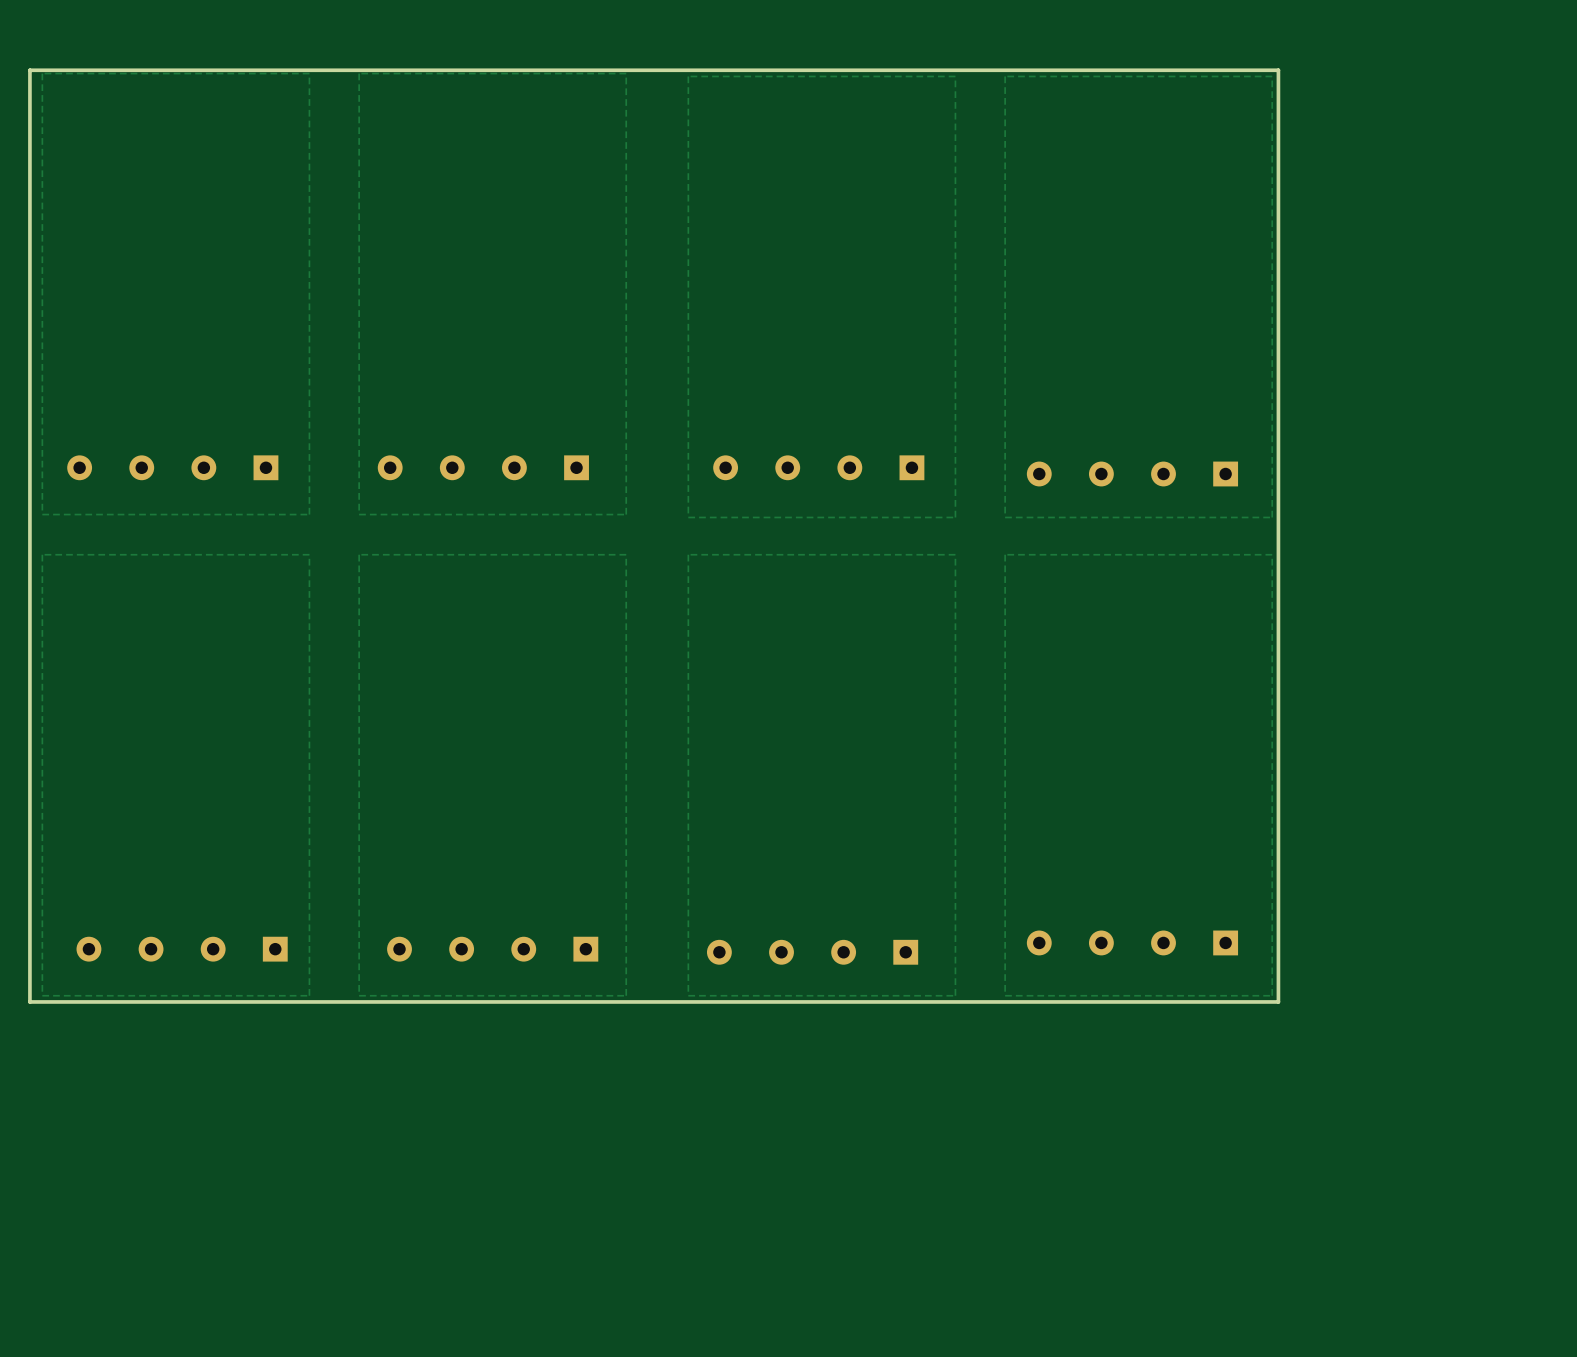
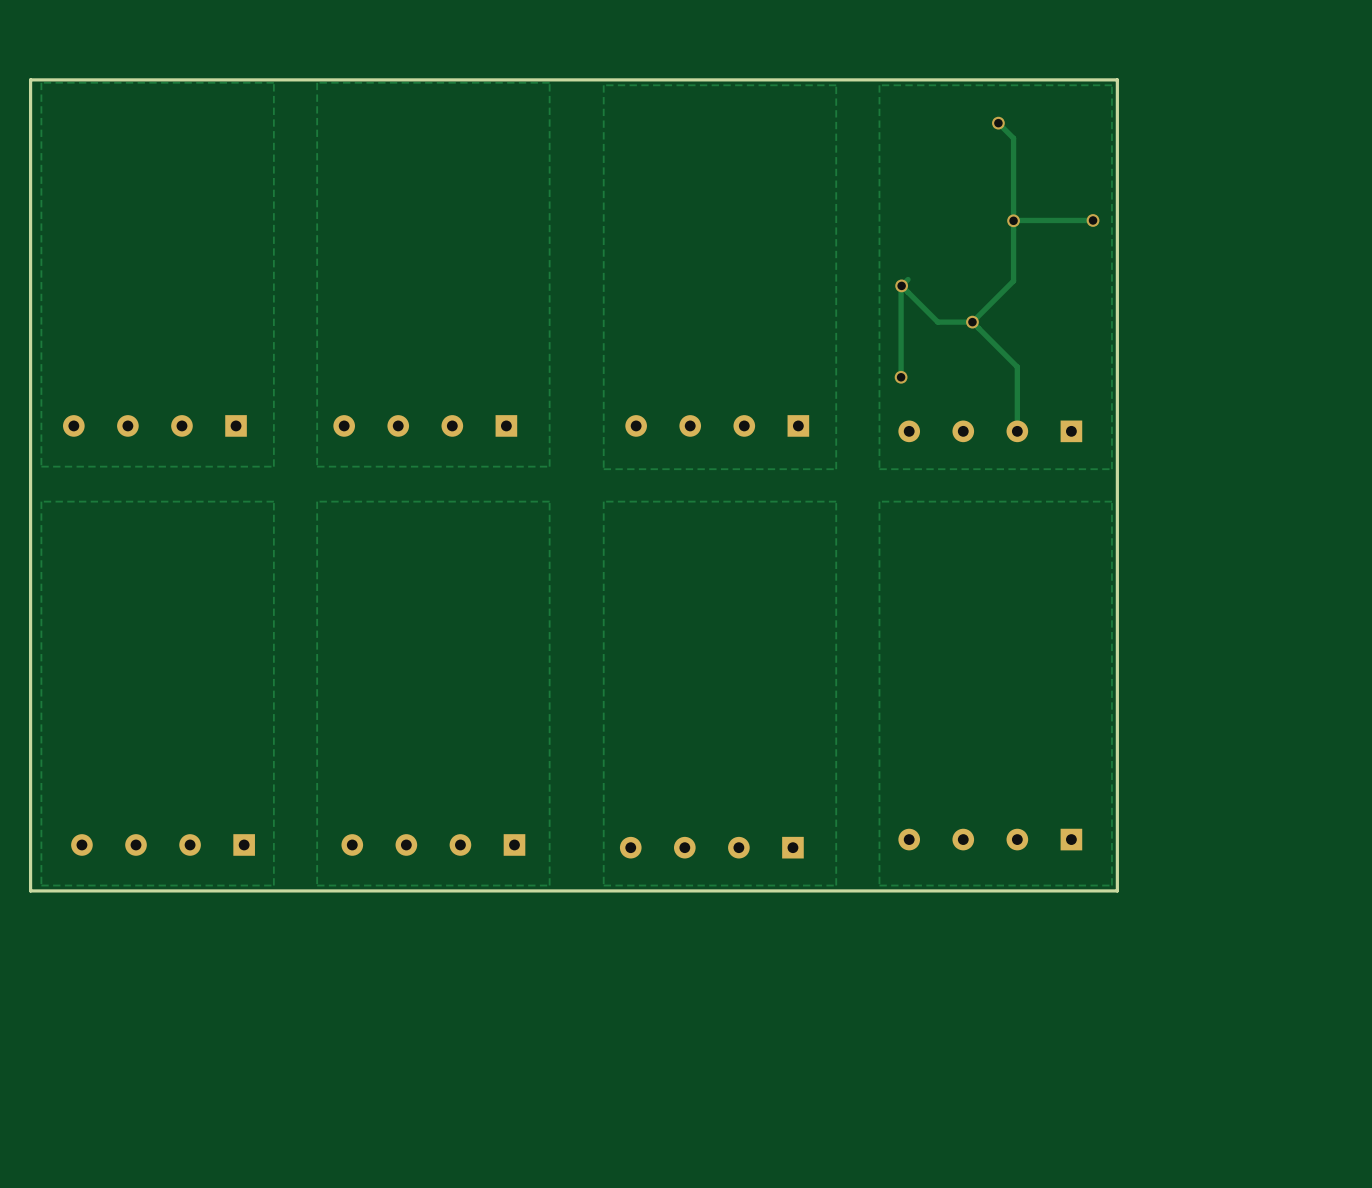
track: none -> (998, 123) (1013, 138) (1013, 281) (972, 322)
via: none -> (998, 123)
track: none -> (1093, 220) (1013, 220)
via: none -> (1093, 220)
via: none -> (1013, 220)
track: none -> (908, 279) (901, 286) (901, 377)
track: none -> (901, 285) (937, 322) (972, 322)
via: none -> (901, 285)
track: none -> (972, 322) (1017, 367) (1017, 431)
via: none -> (972, 322)
via: none -> (901, 377)

